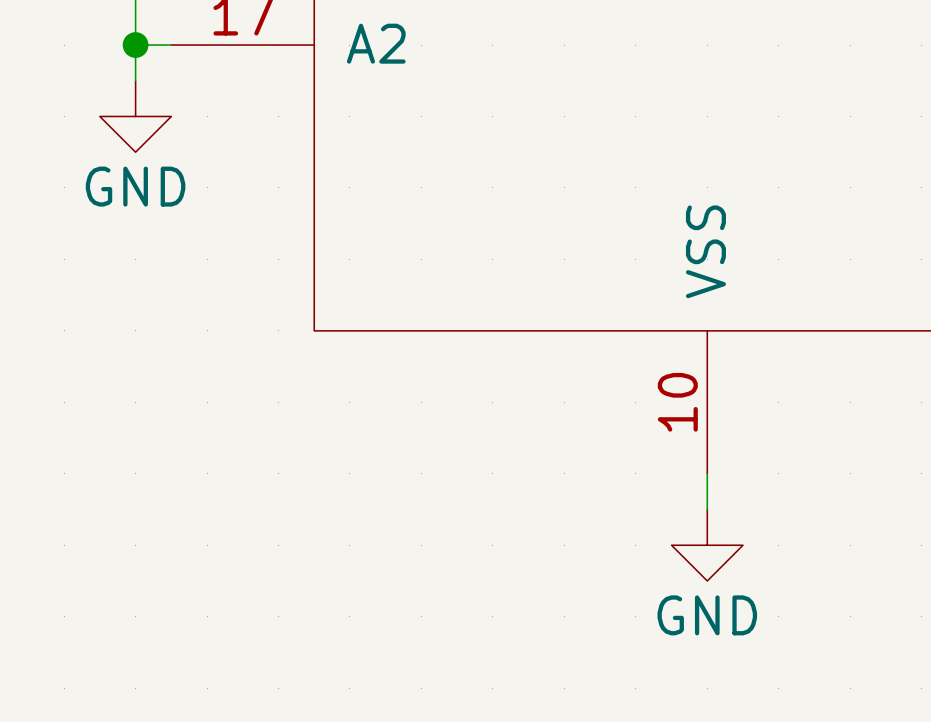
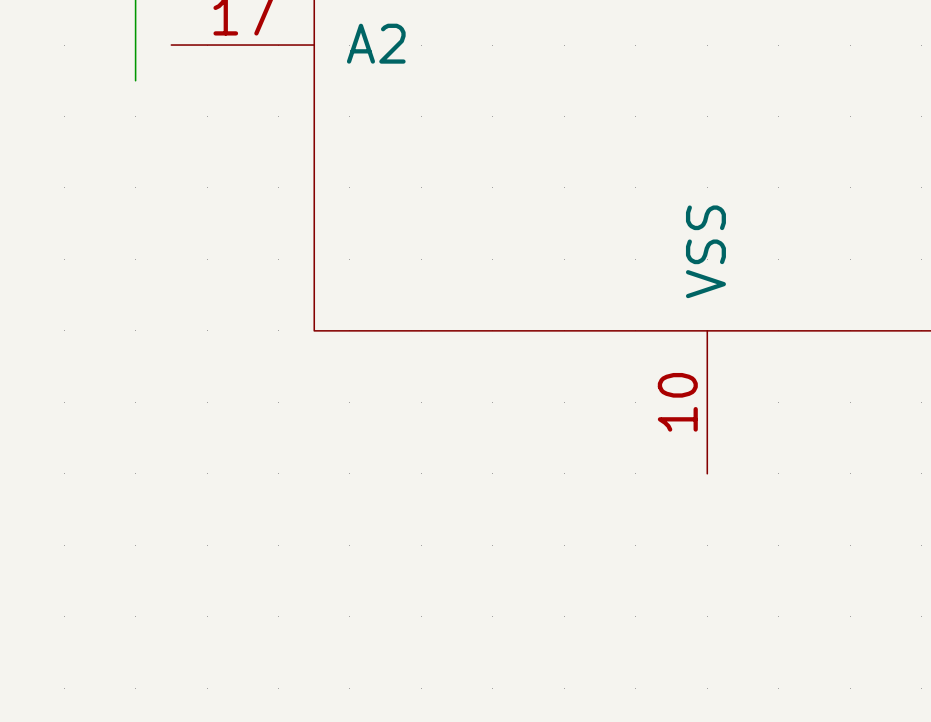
wire: (135, 45) (171, 45) -> none
junction: (135, 45) -> none
power symbol: GND (135, 116) -> none
wire: (707, 473) (707, 509) -> none
power symbol: GND (707, 545) -> none

